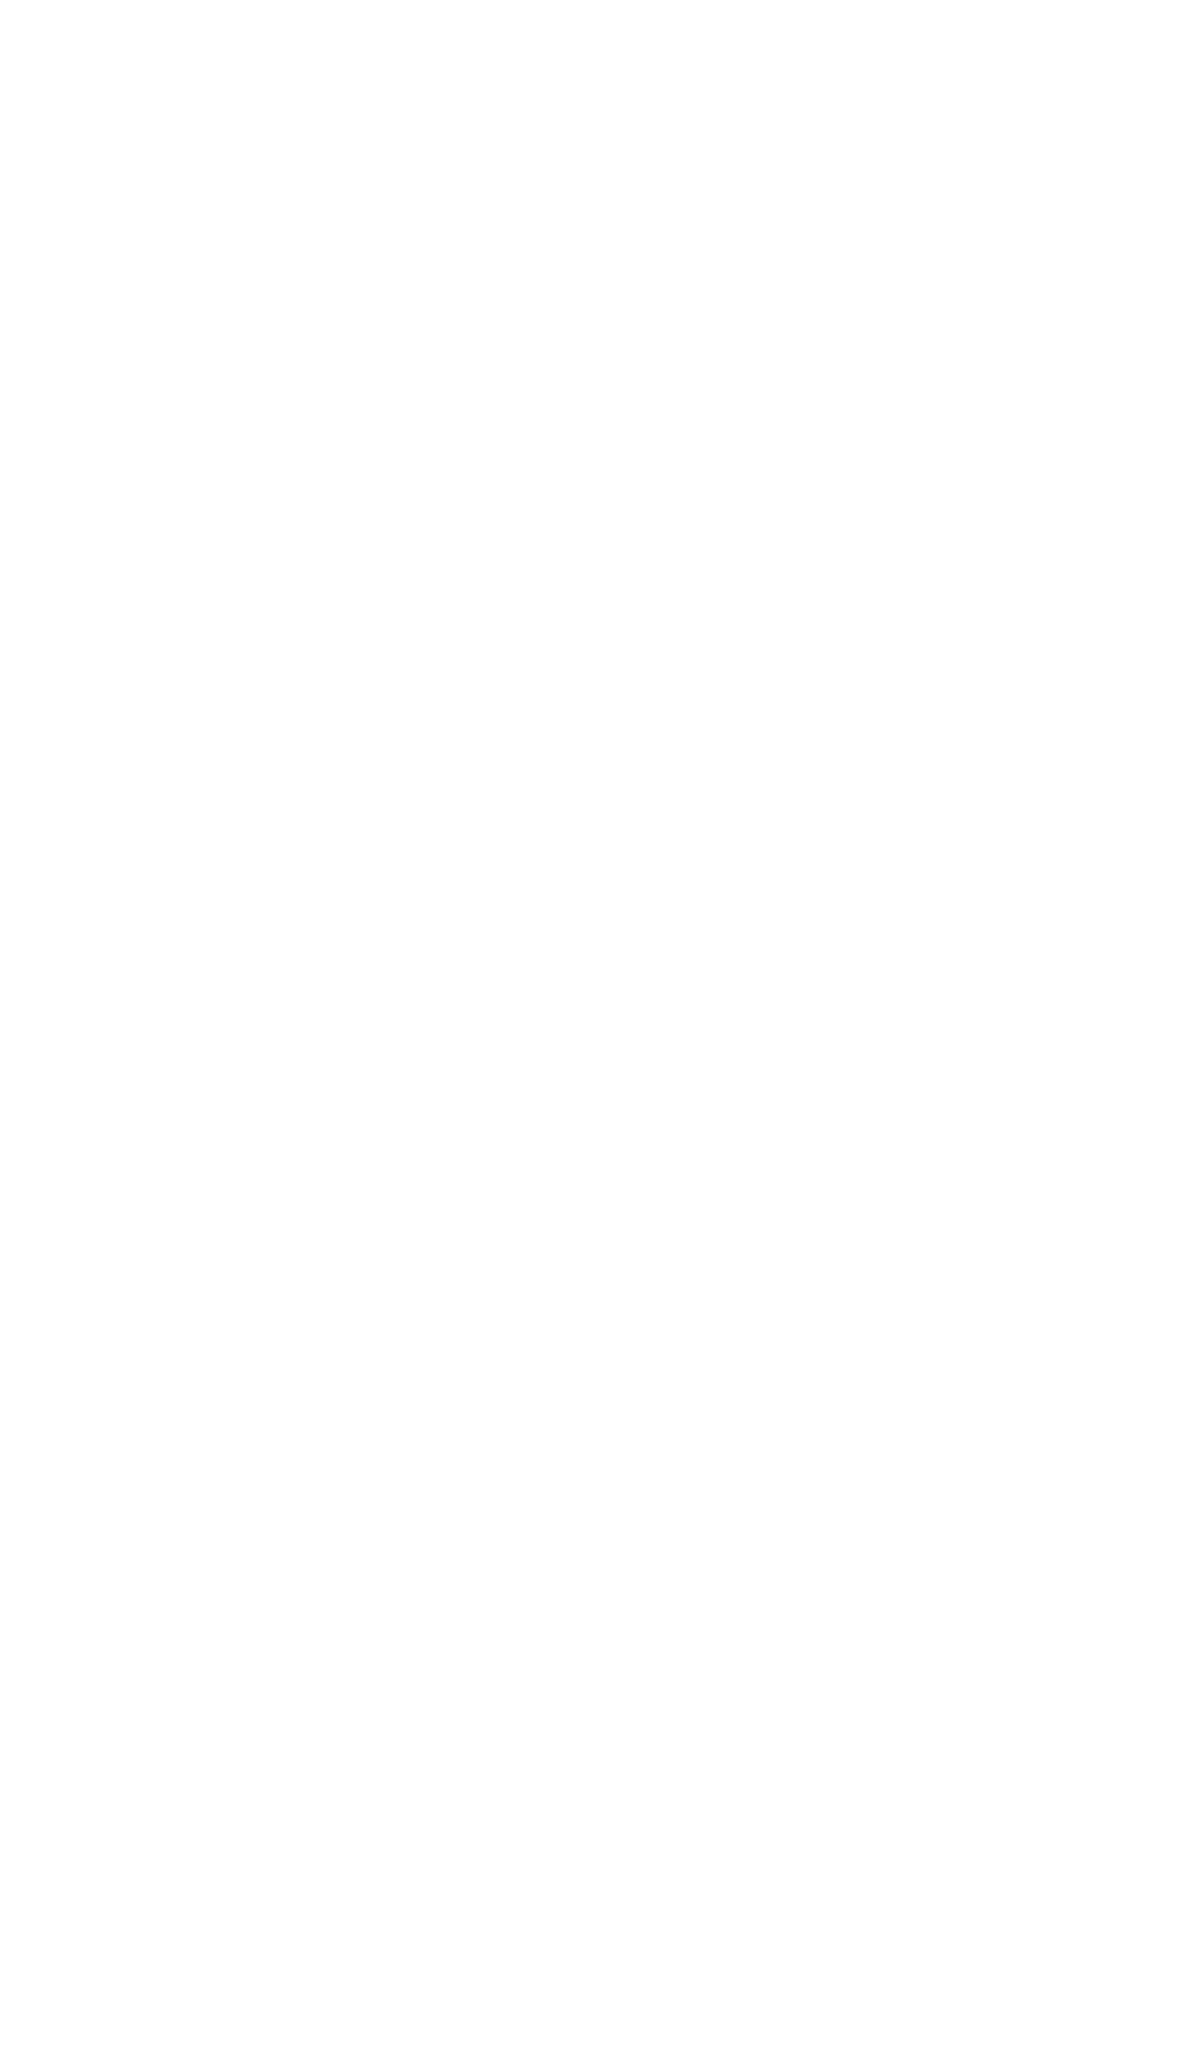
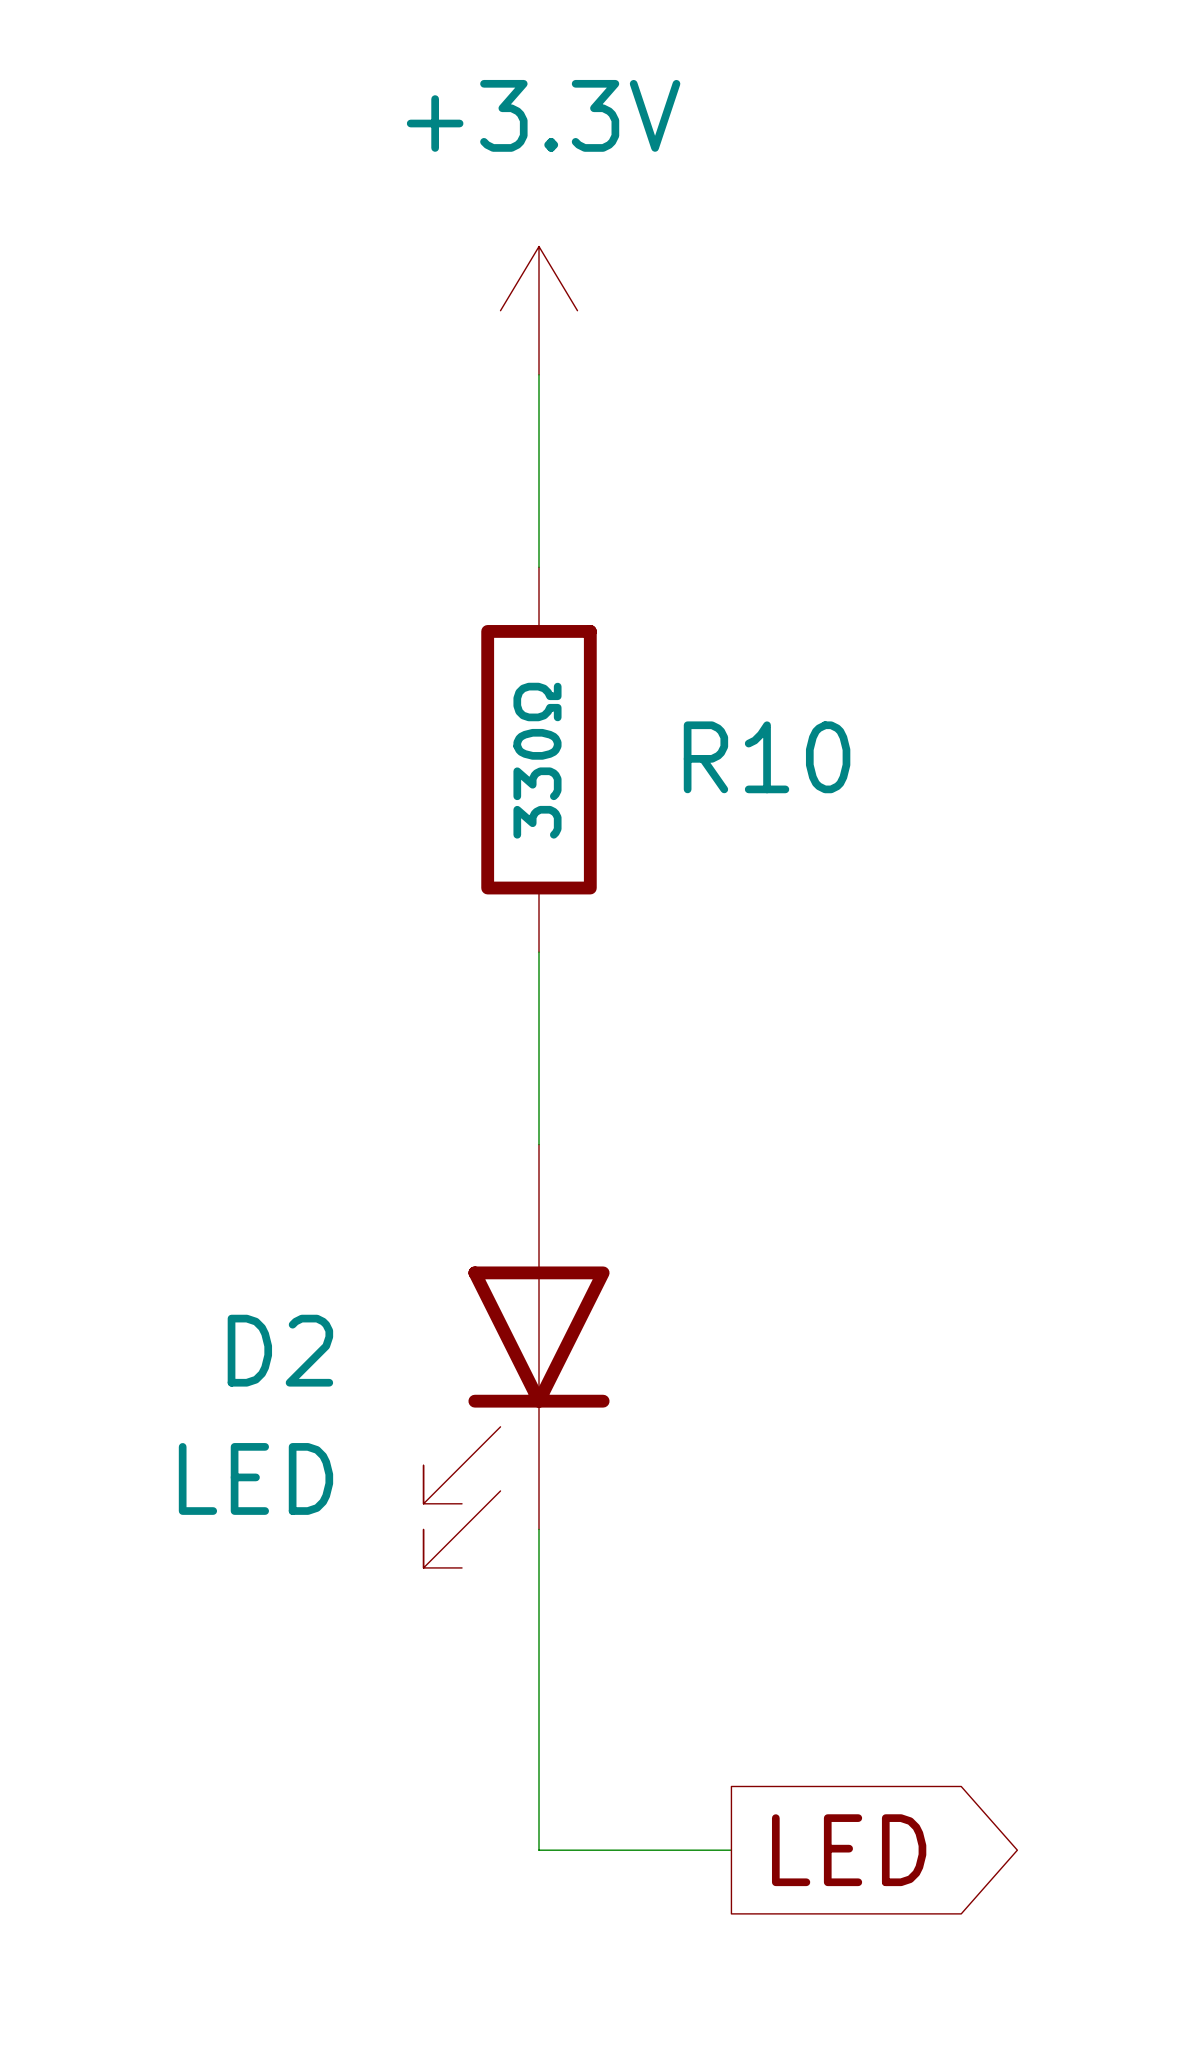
power symbol: none -> +3.3V (539, 310)
wire: none -> (539, 374) (539, 567)
R10: none -> 330Ω (539, 759)
wire: none -> (539, 952) (539, 1144)
D2: none -> LED (516, 1356)
wire: none -> (539, 1529) (539, 1850) (731, 1850)
global label: none -> LED (849, 1850)

